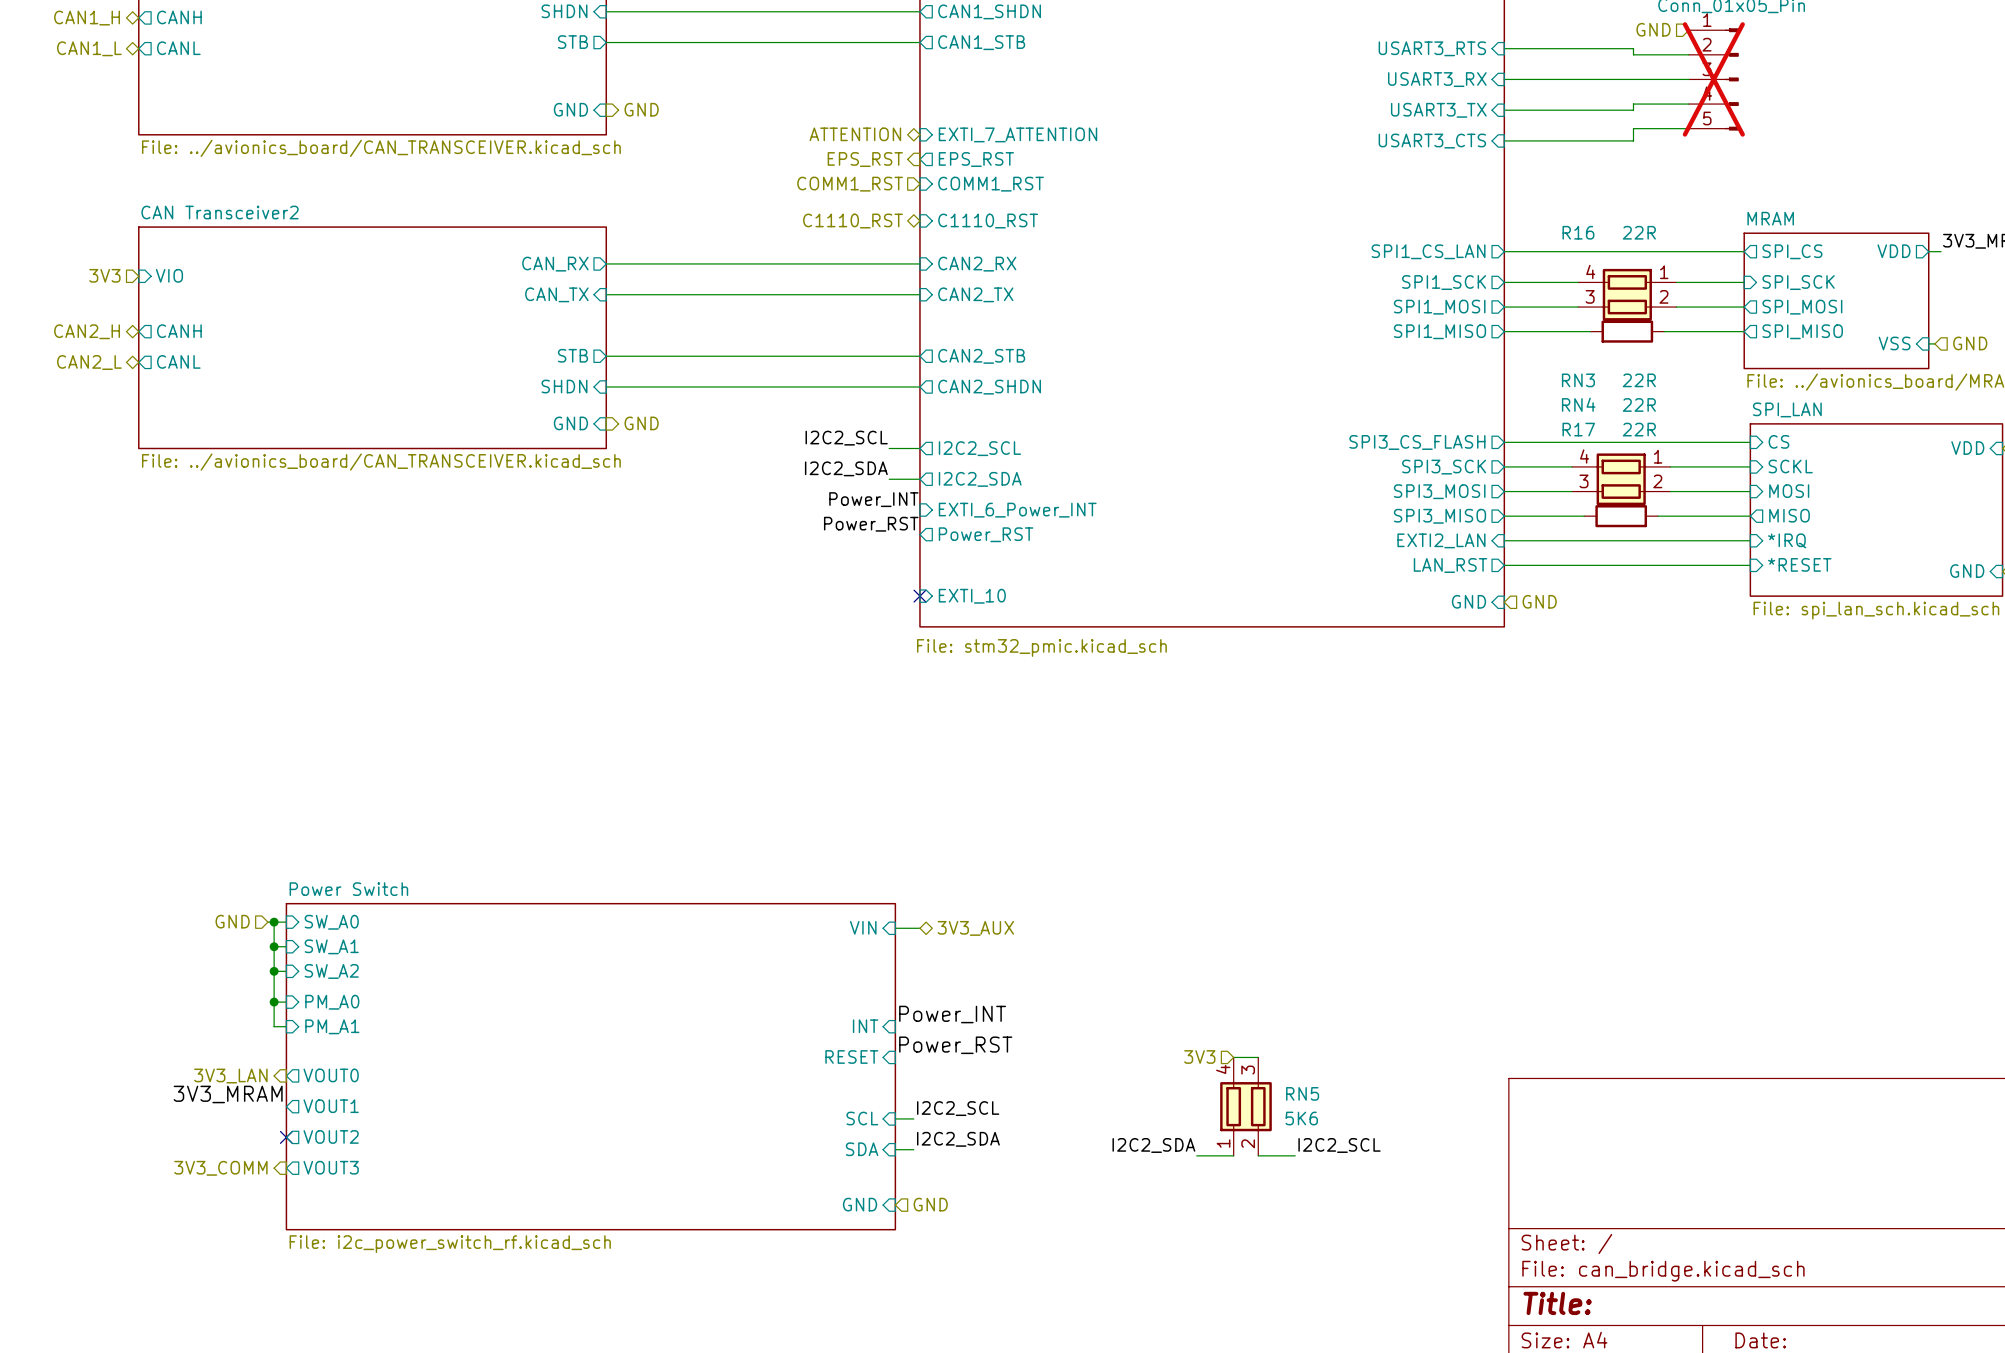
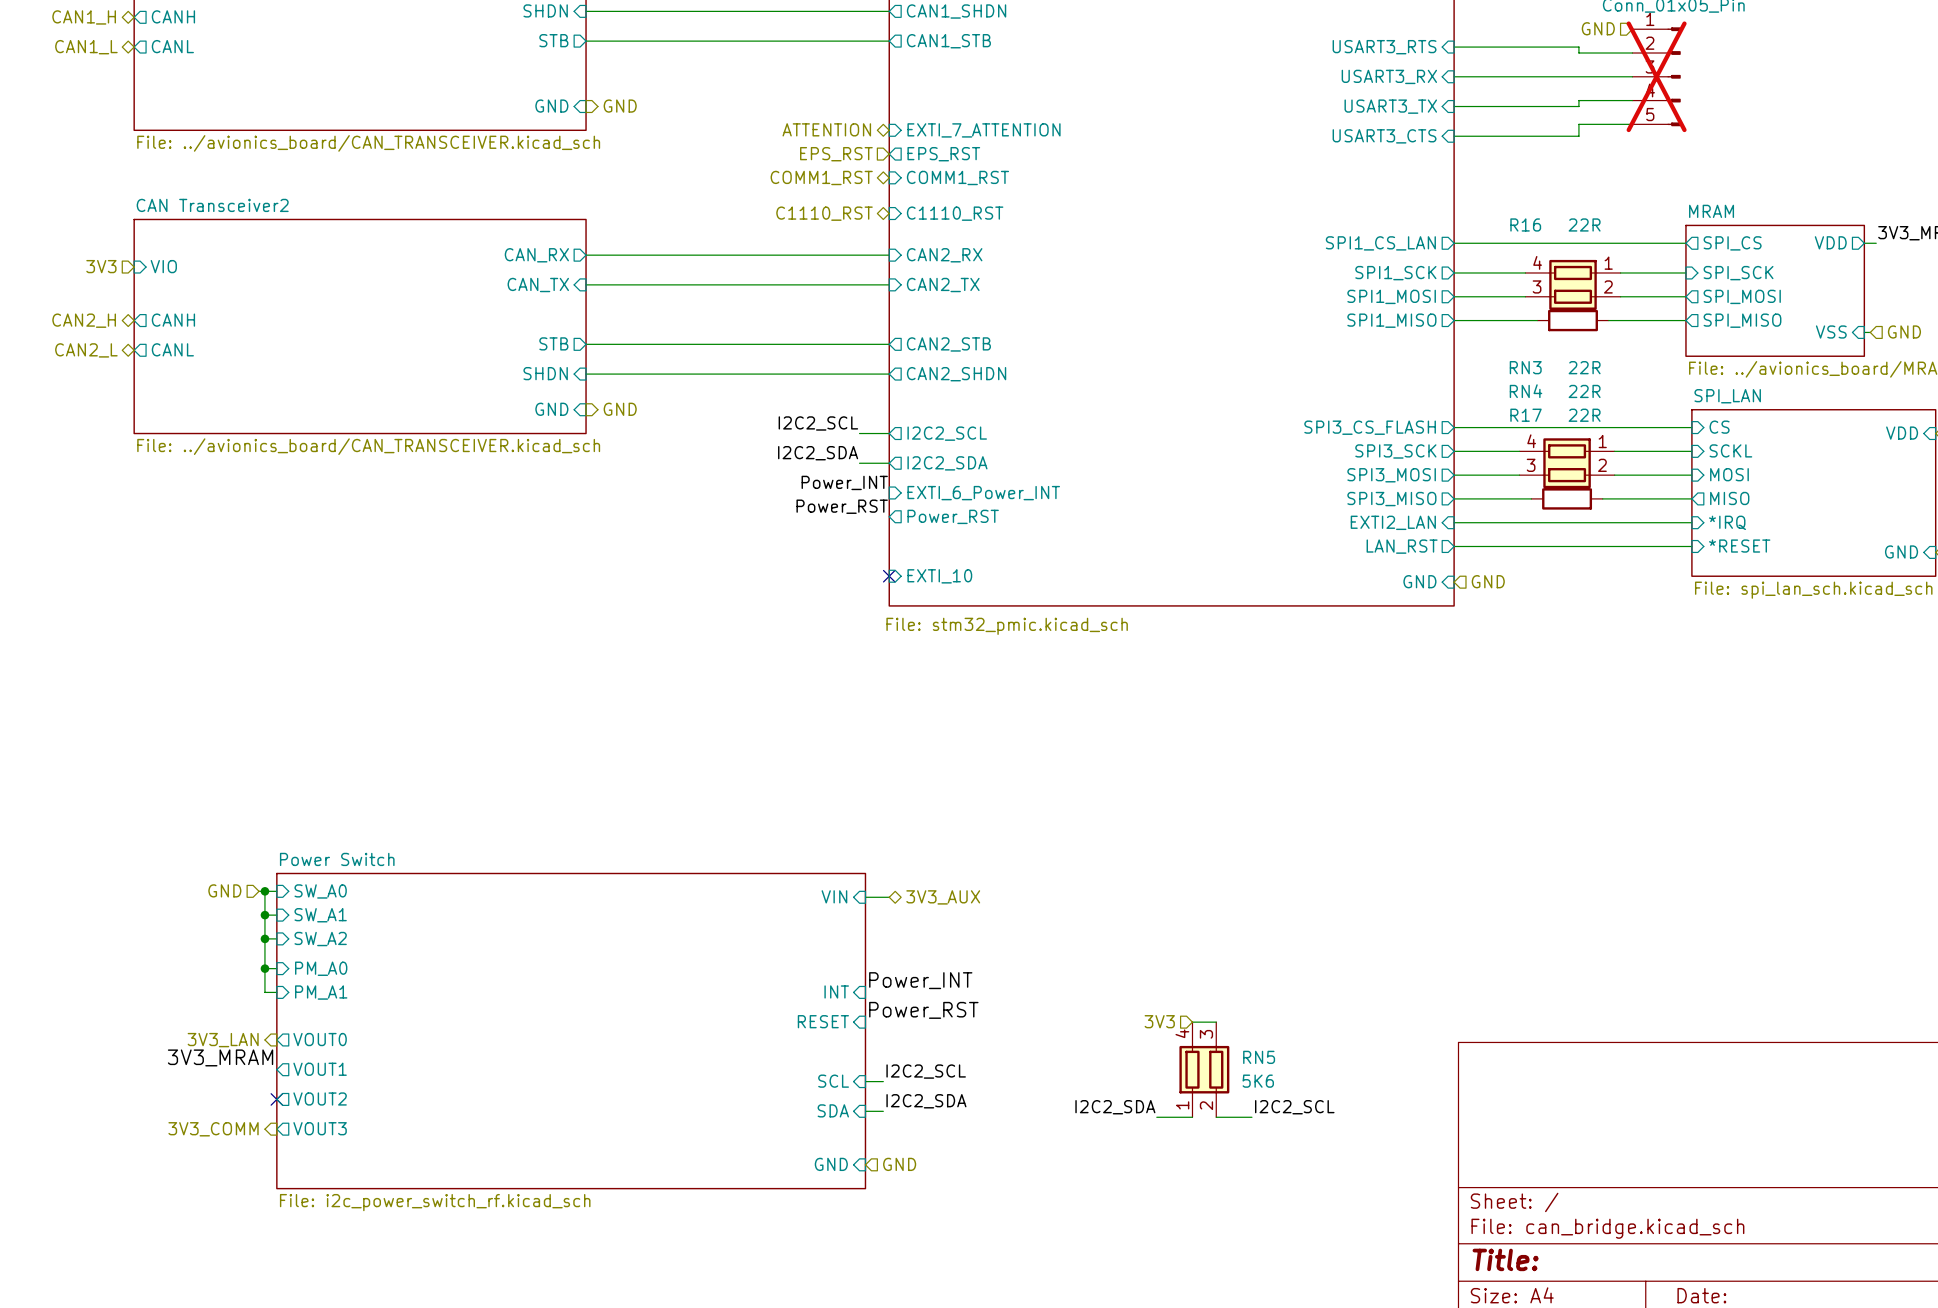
hierarchical label shape: output (865, 159) -> input (836, 154)
hierarchical label shape: input (850, 184) -> bidirectional (821, 177)

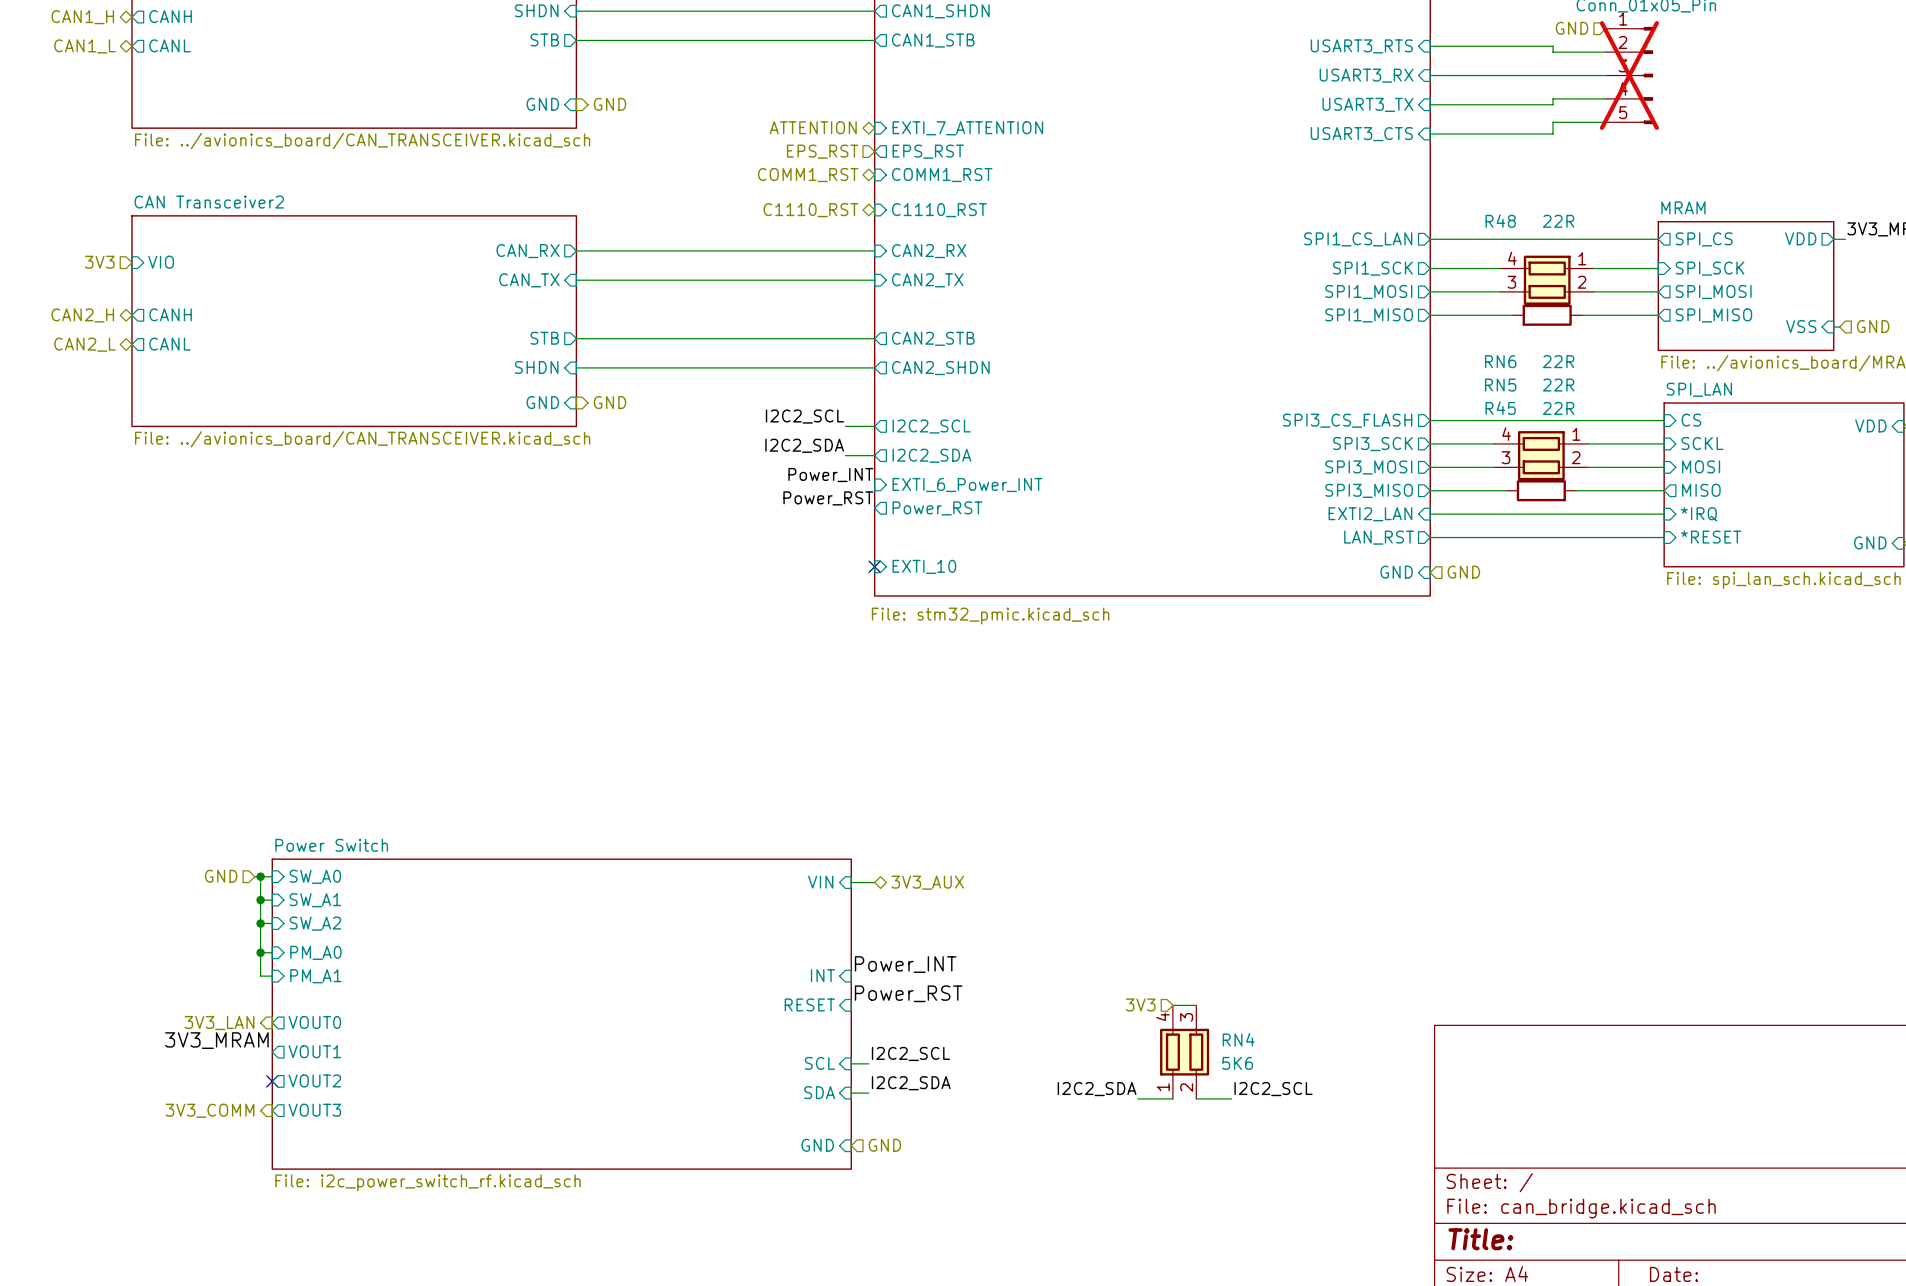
R16 name: R16 (1525, 224) -> R48 (1500, 221)
RN3 name: RN3 (1525, 367) -> RN6 (1500, 361)
RN4 name: RN4 (1526, 391) -> RN5 (1500, 385)
R17 name: R17 (1526, 415) -> R45 (1500, 408)
RN5 name: RN5 (1259, 1057) -> RN4 (1238, 1039)

